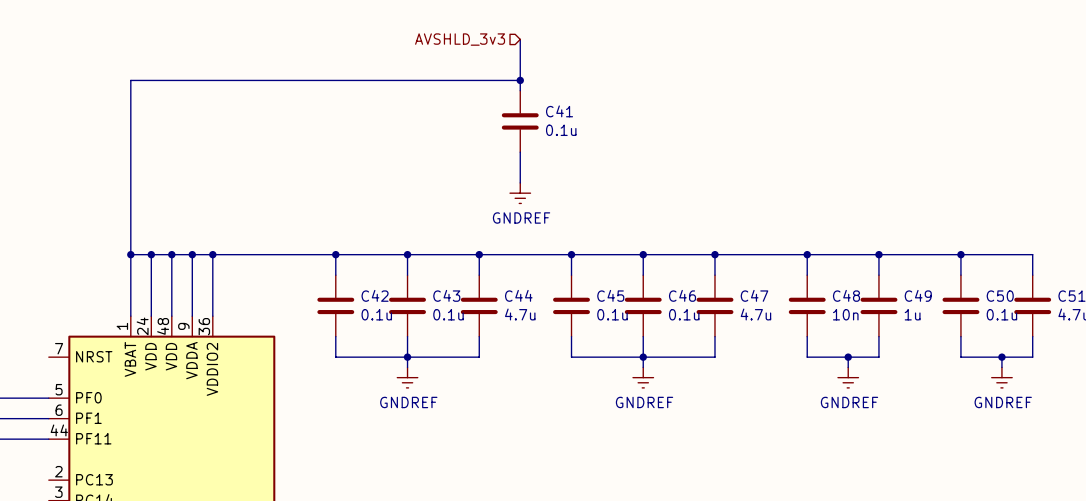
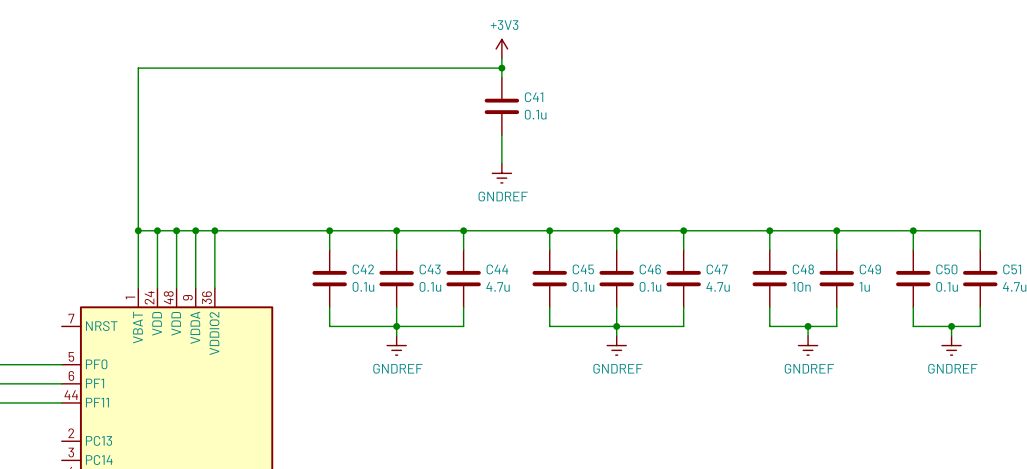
hierarchical label: AVSHLD_3v3 (460, 39) -> none
power symbol: none -> +3V3 (501, 48)

